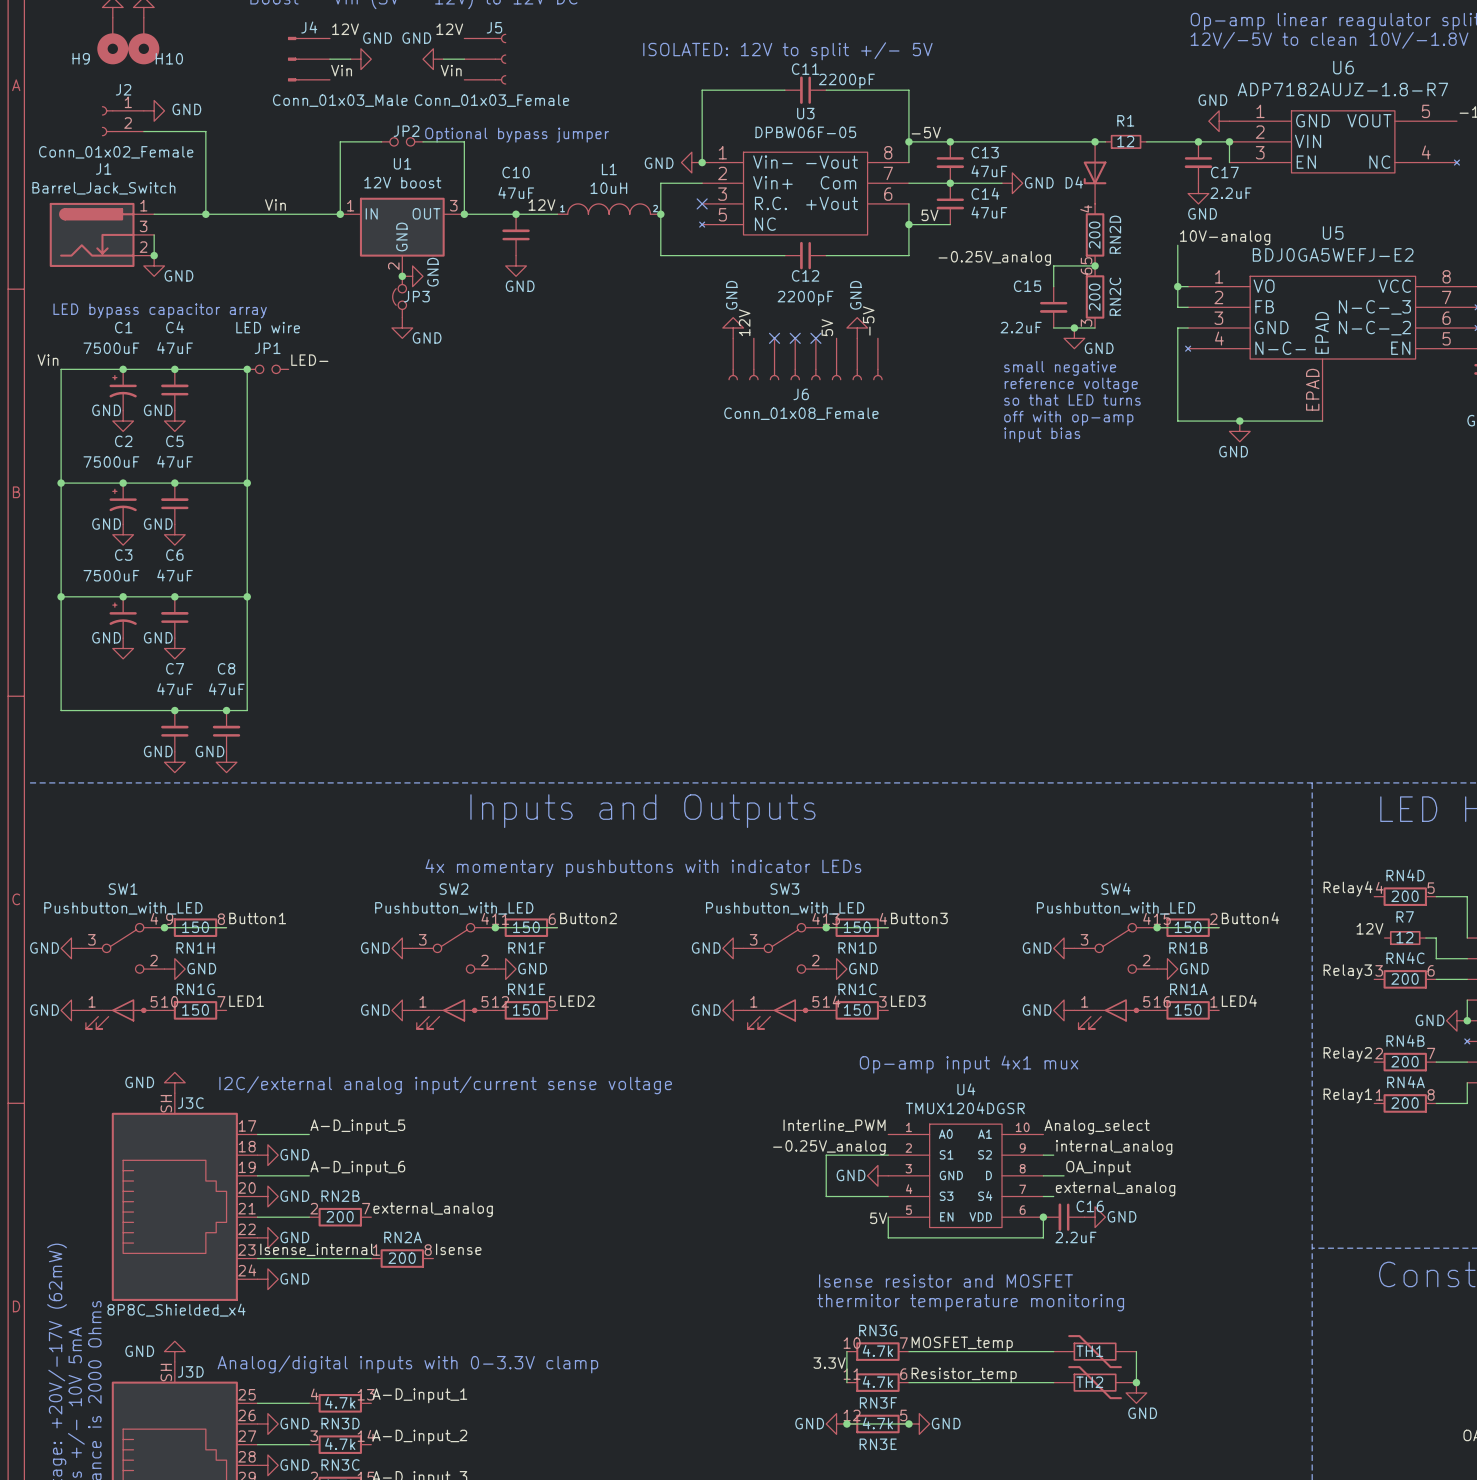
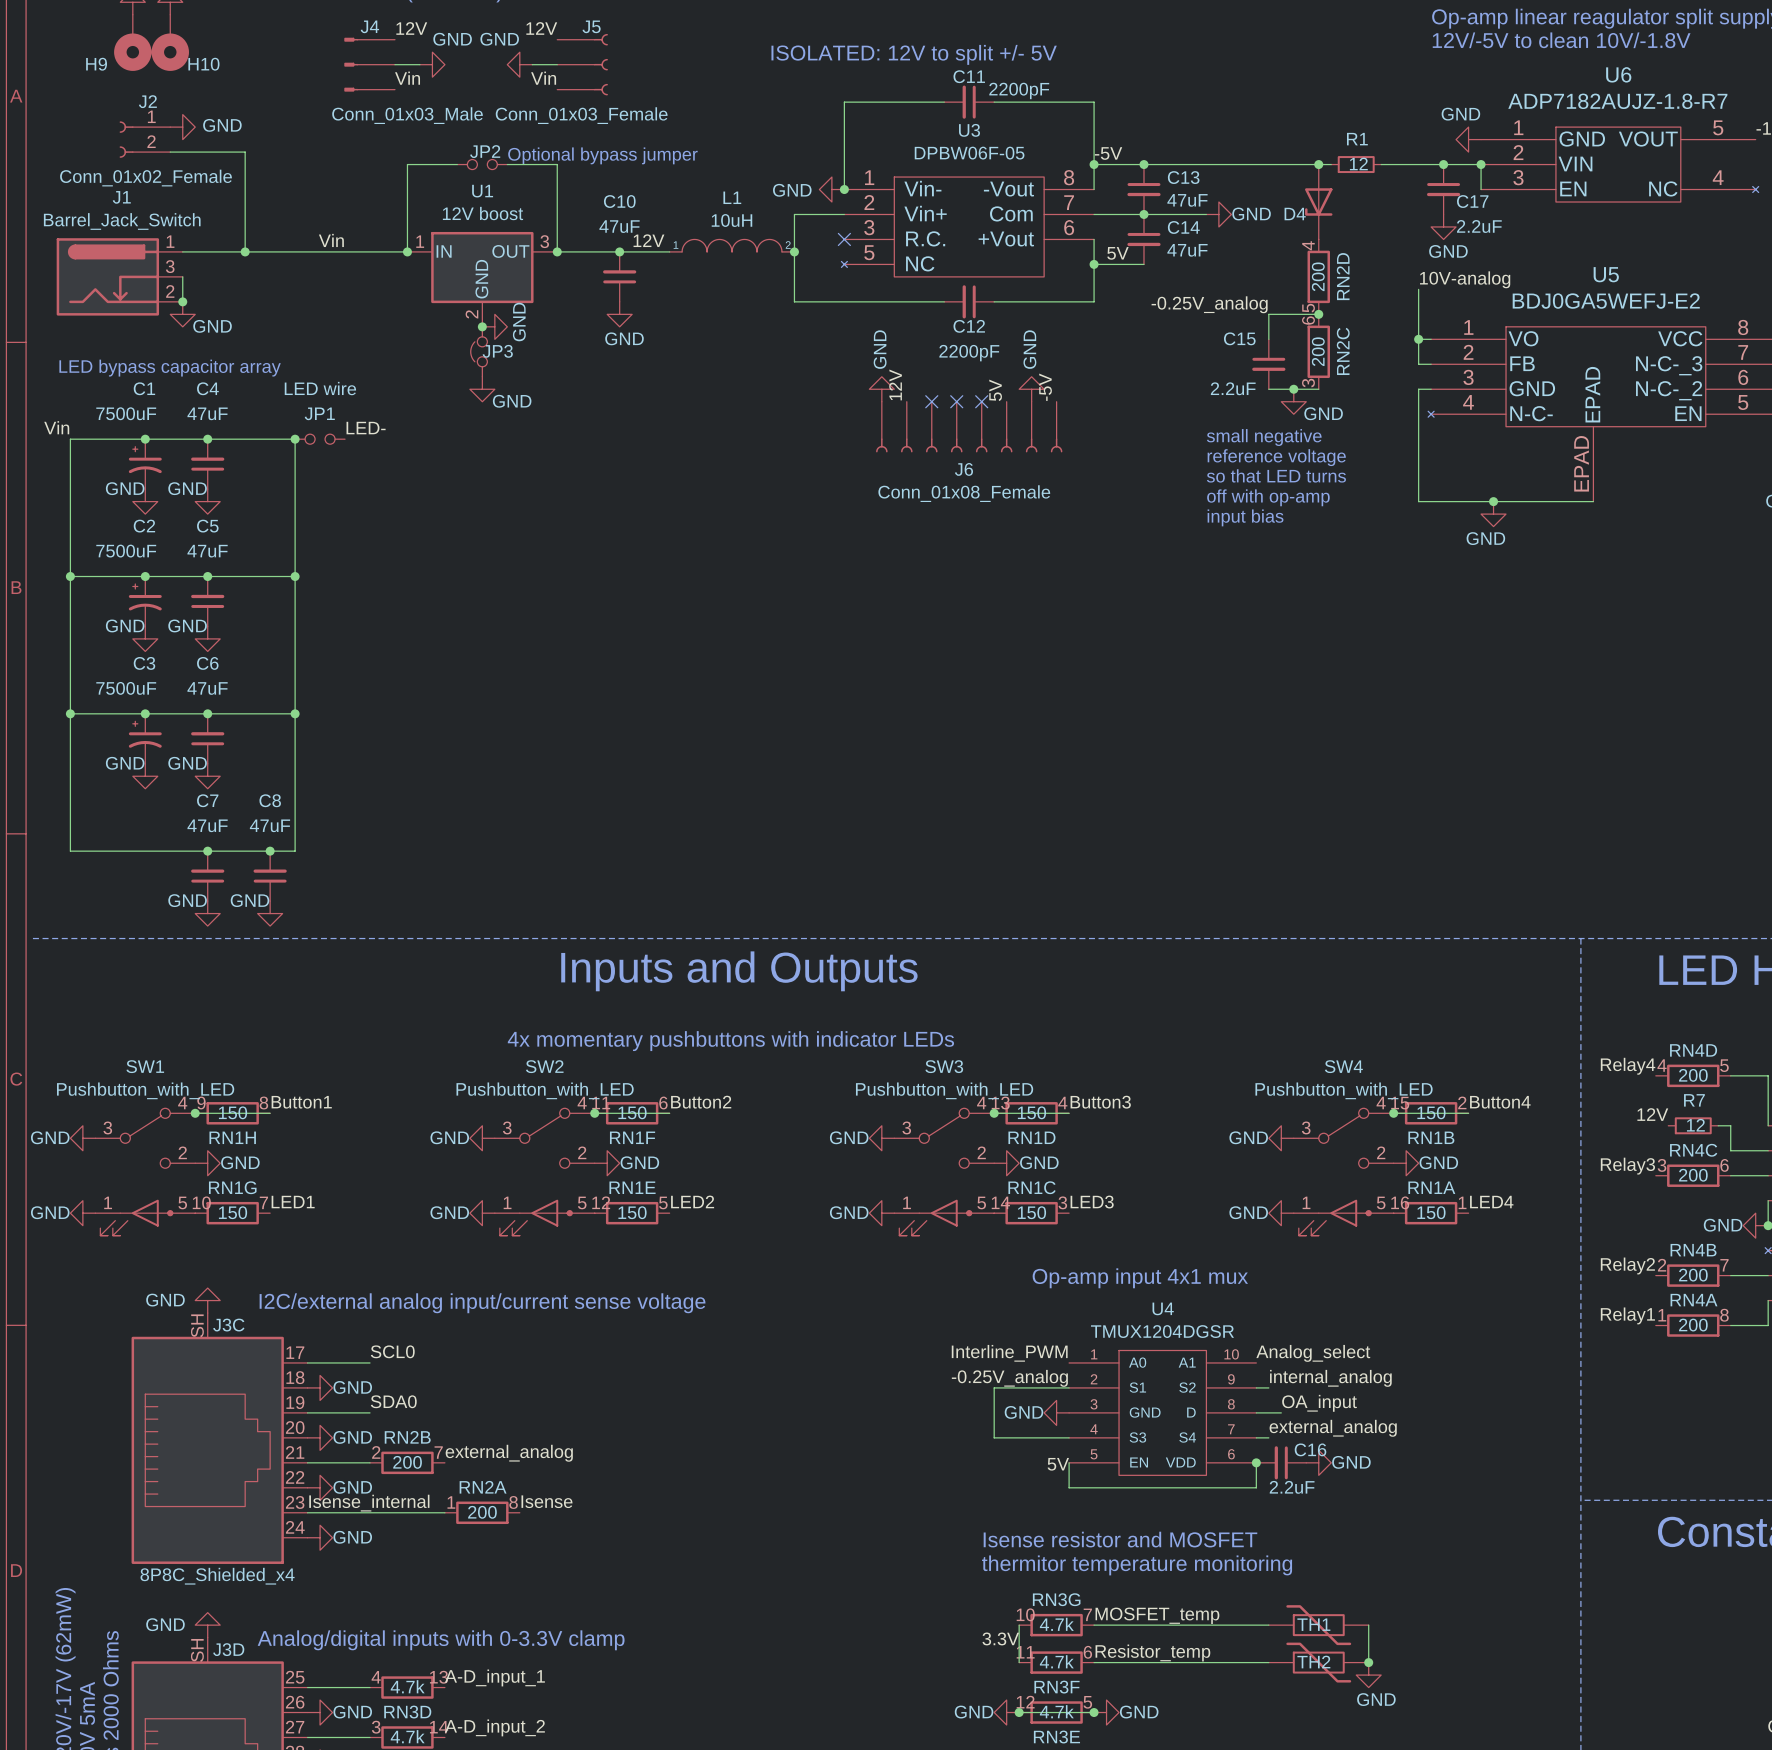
label: A-D_input_5 (357, 1126) -> SCL0 (392, 1351)
label: A-D_input_6 (357, 1168) -> SDA0 (393, 1401)

